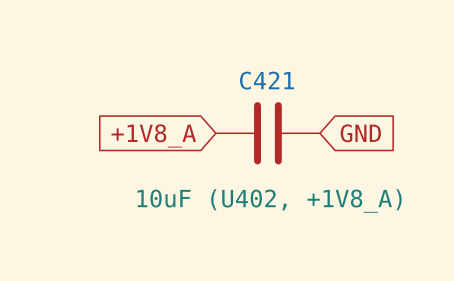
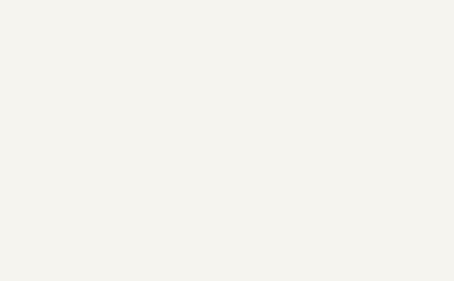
C421: 10uF (U402, +1V8_A) (267, 133) -> none
global label: GND (360, 133) -> none
global label: +1V8_A (153, 135) -> none

